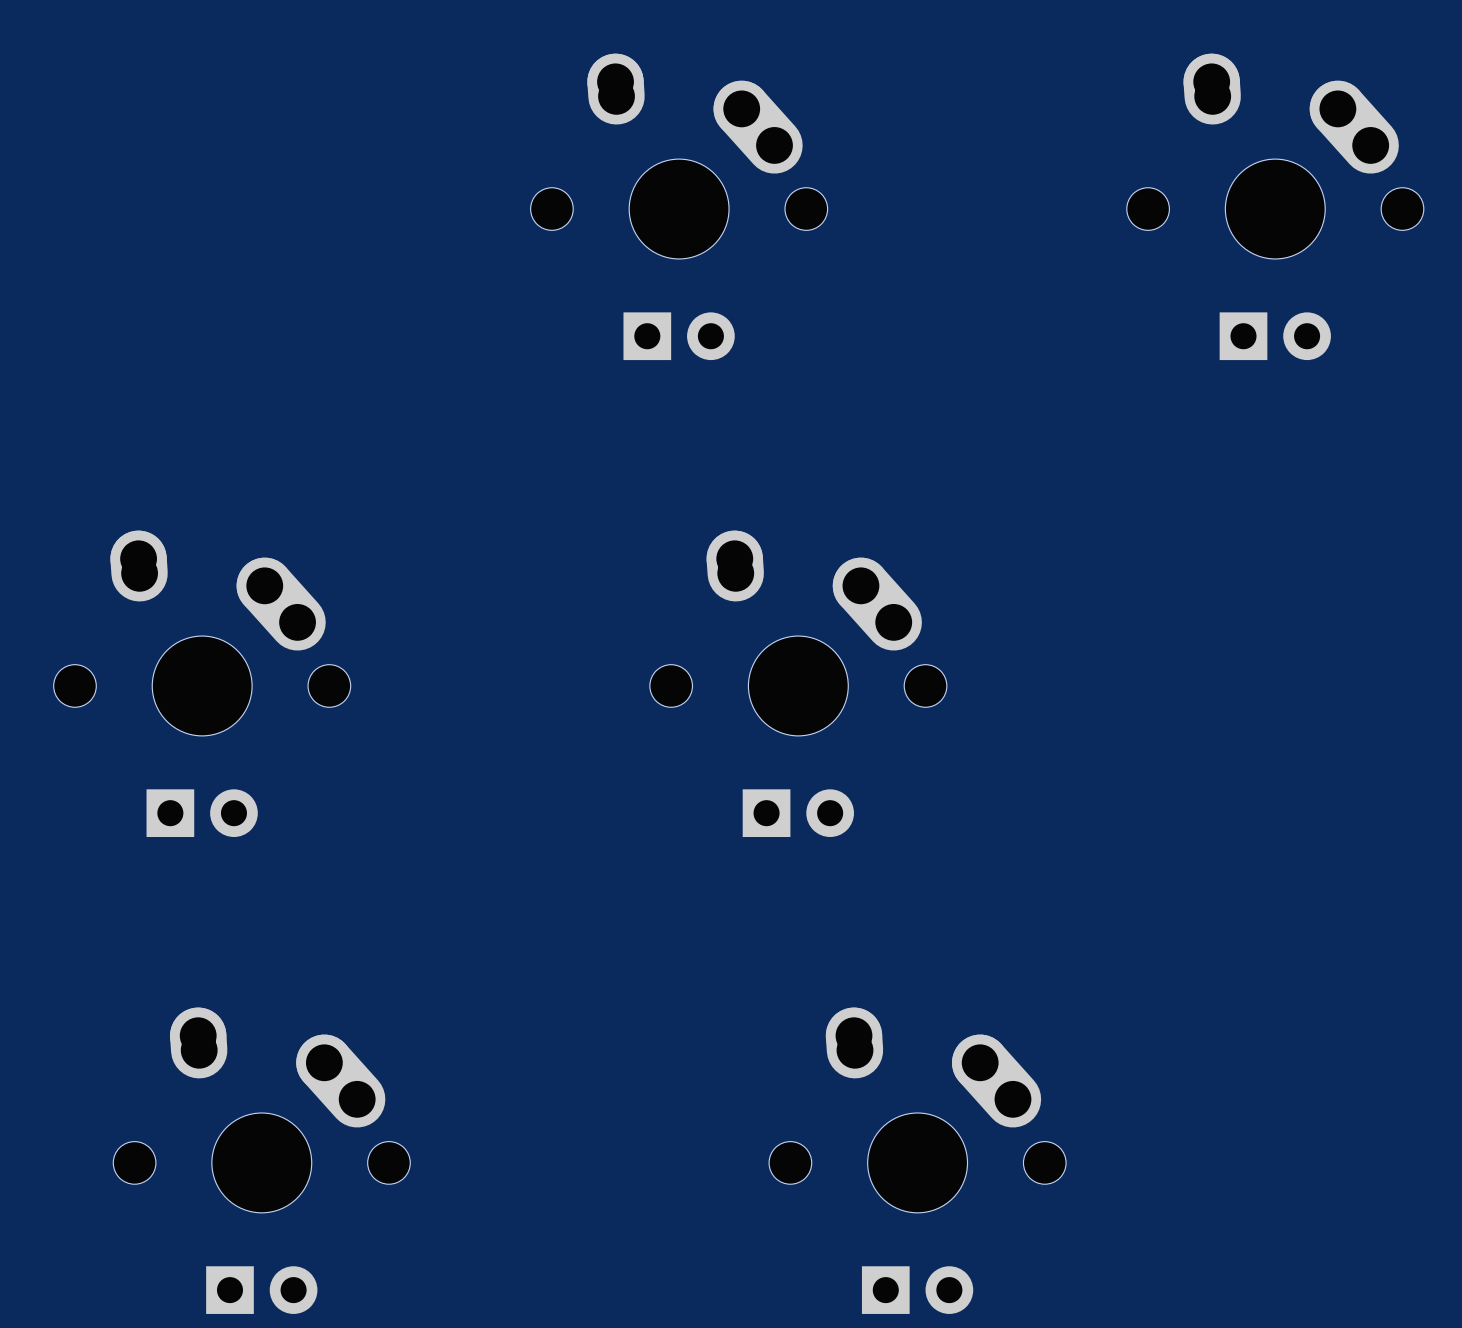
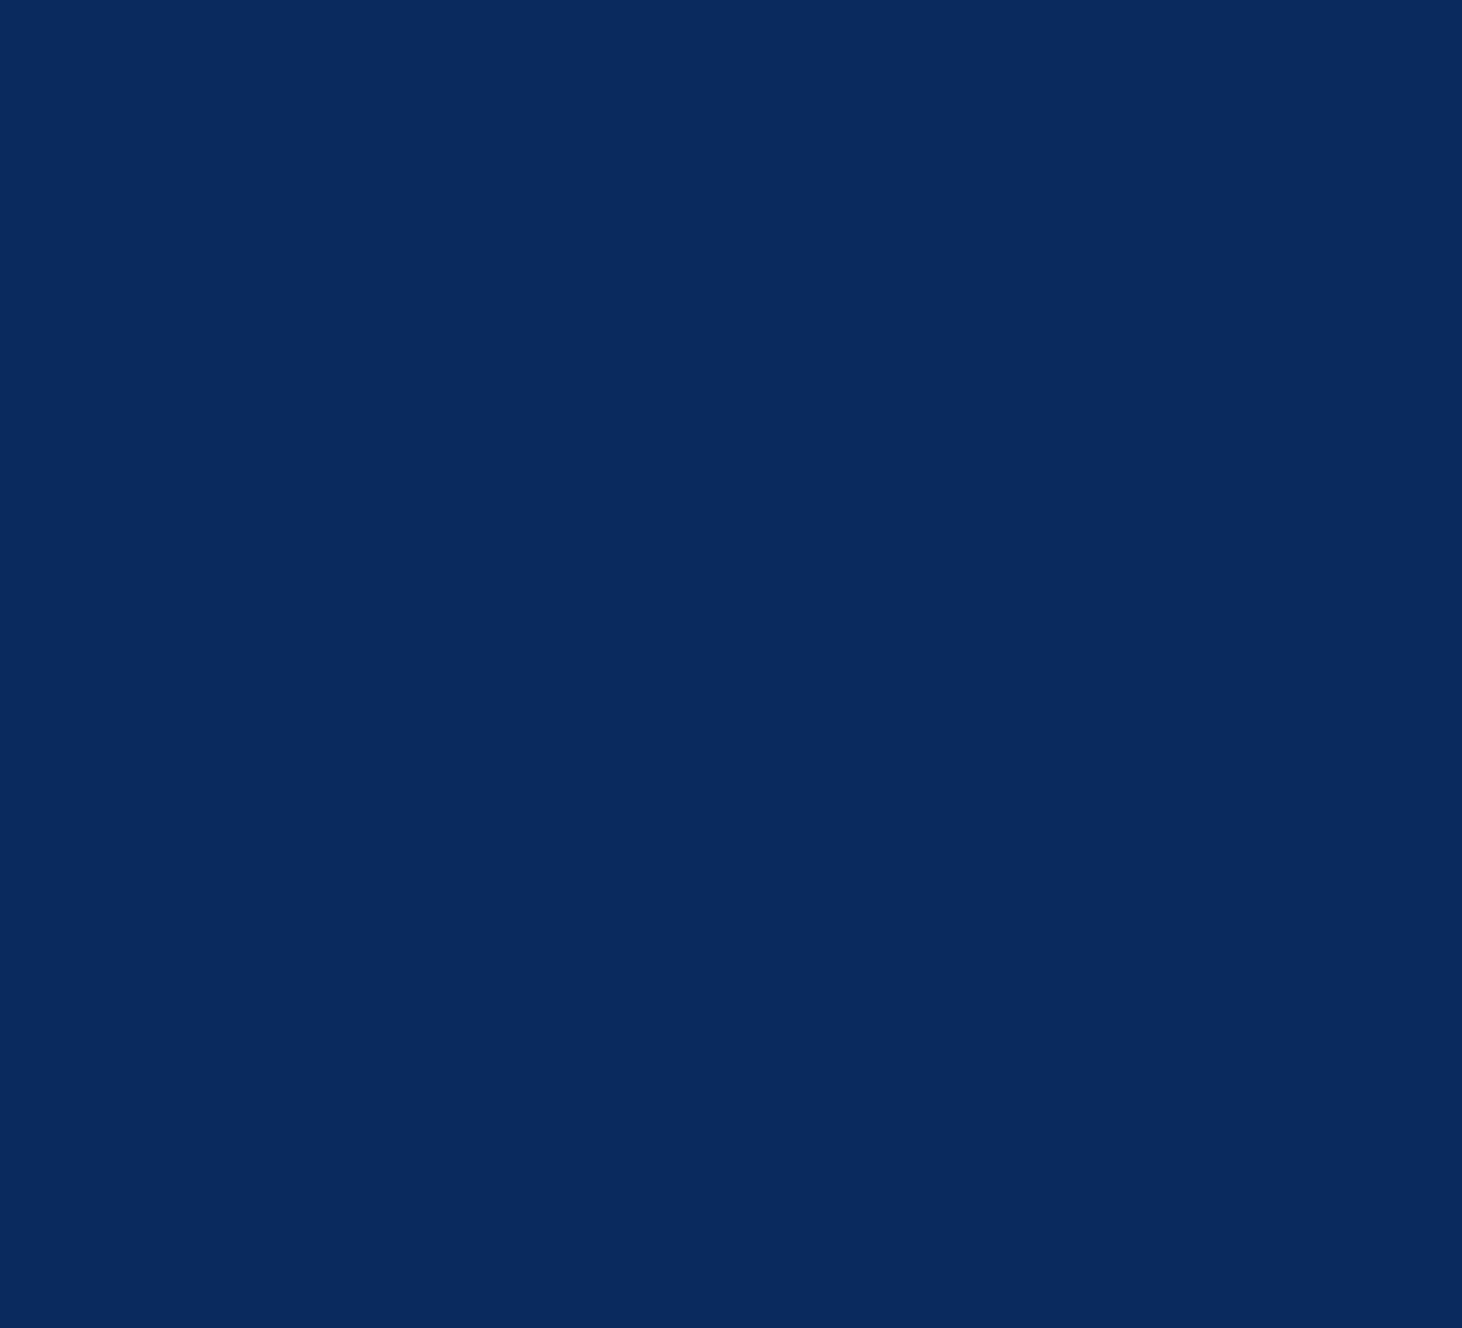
part: (679, 206) -> none
part: (1275, 206) -> none
part: (202, 683) -> none
part: (798, 683) -> none
part: (261, 1160) -> none
part: (917, 1160) -> none

